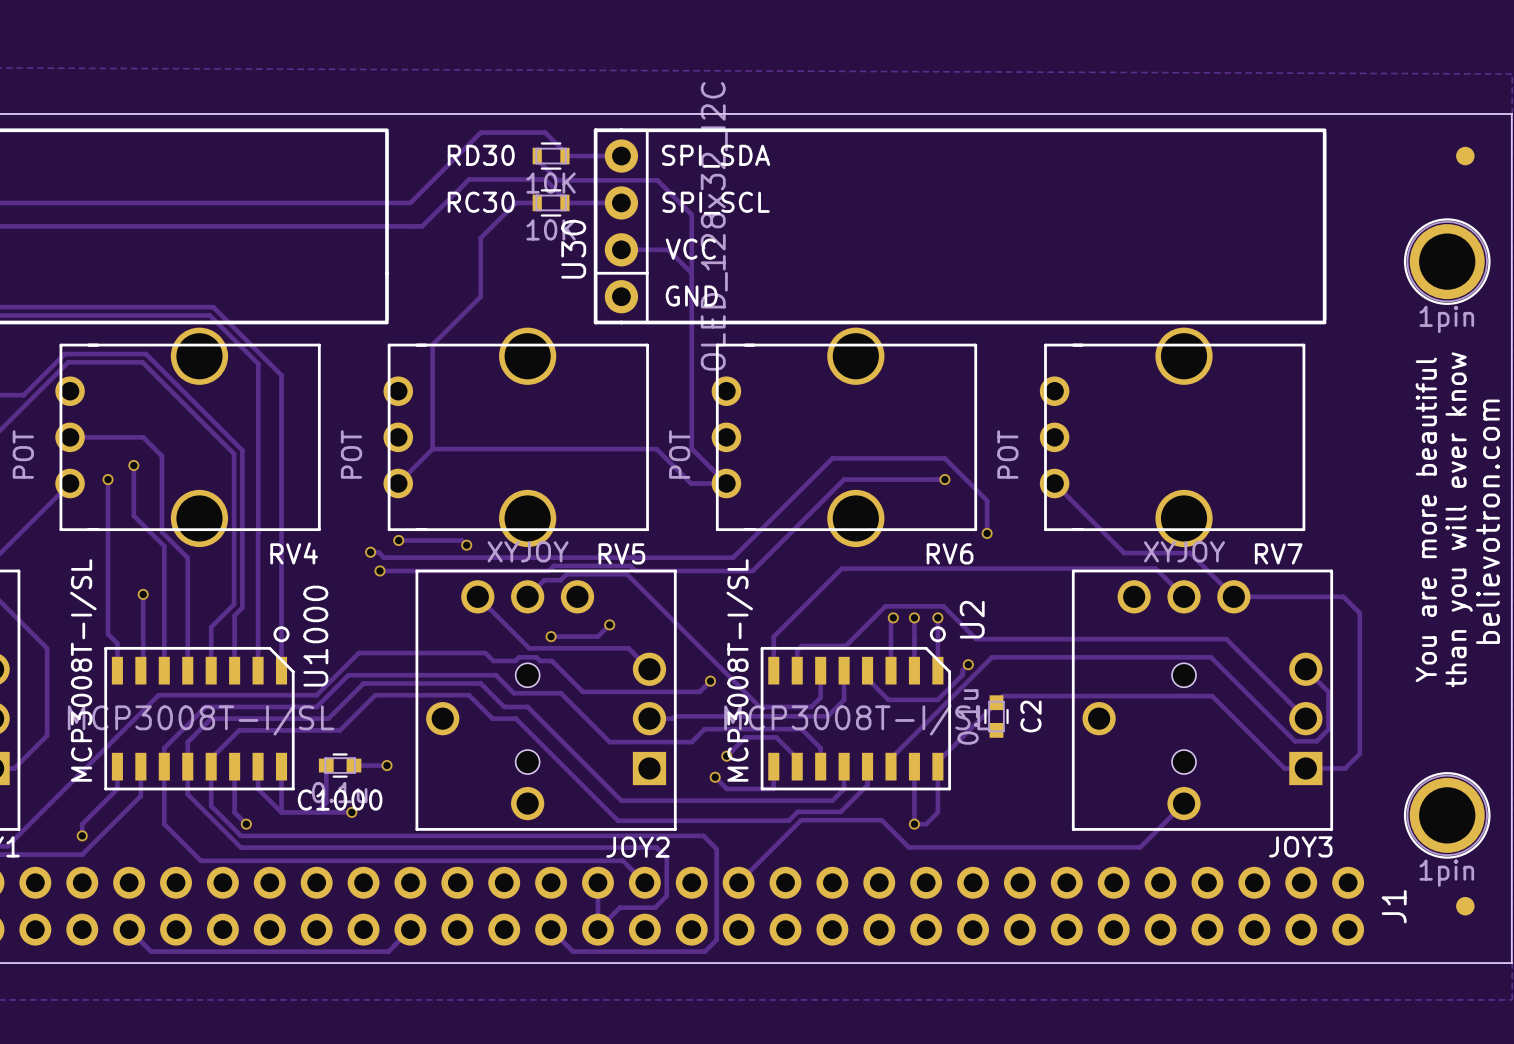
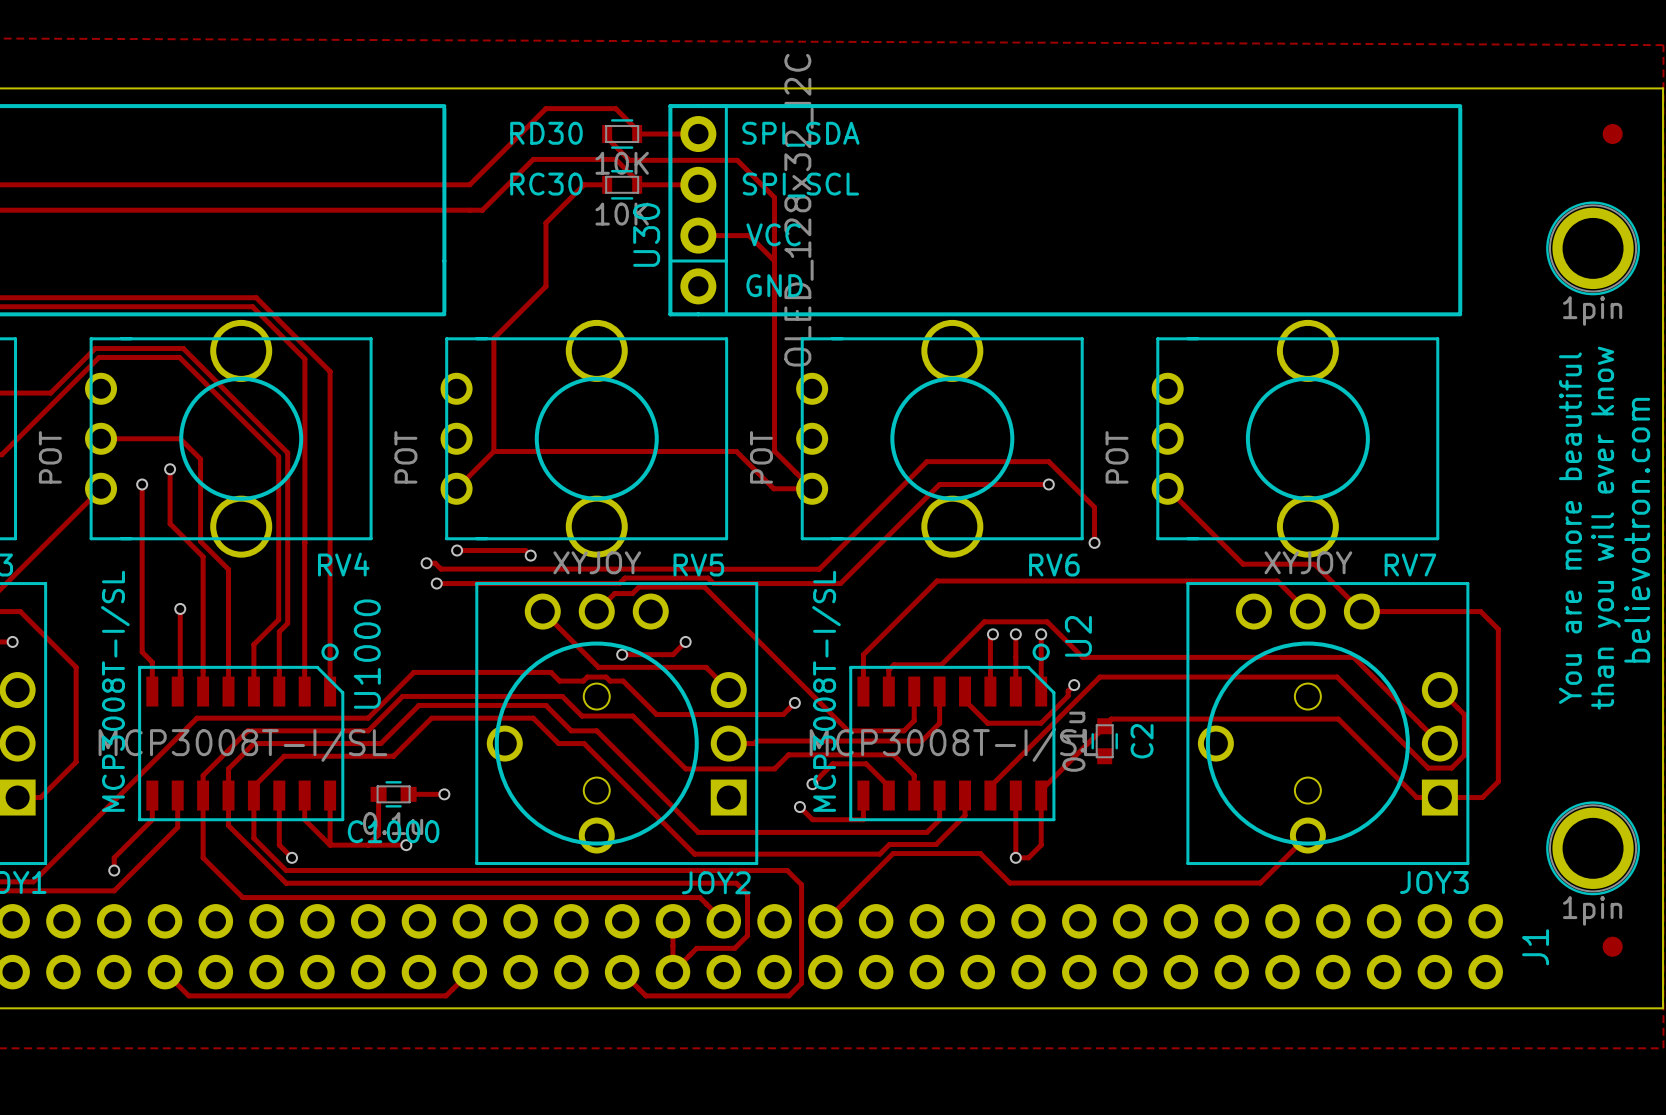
drawing: none -> [179, 376, 304, 501]
drawing: none -> [534, 376, 659, 501]
drawing: none -> [890, 376, 1015, 501]
drawing: none -> [1245, 376, 1370, 501]
drawing: none -> [494, 641, 699, 846]
drawing: none -> [1205, 641, 1410, 846]

